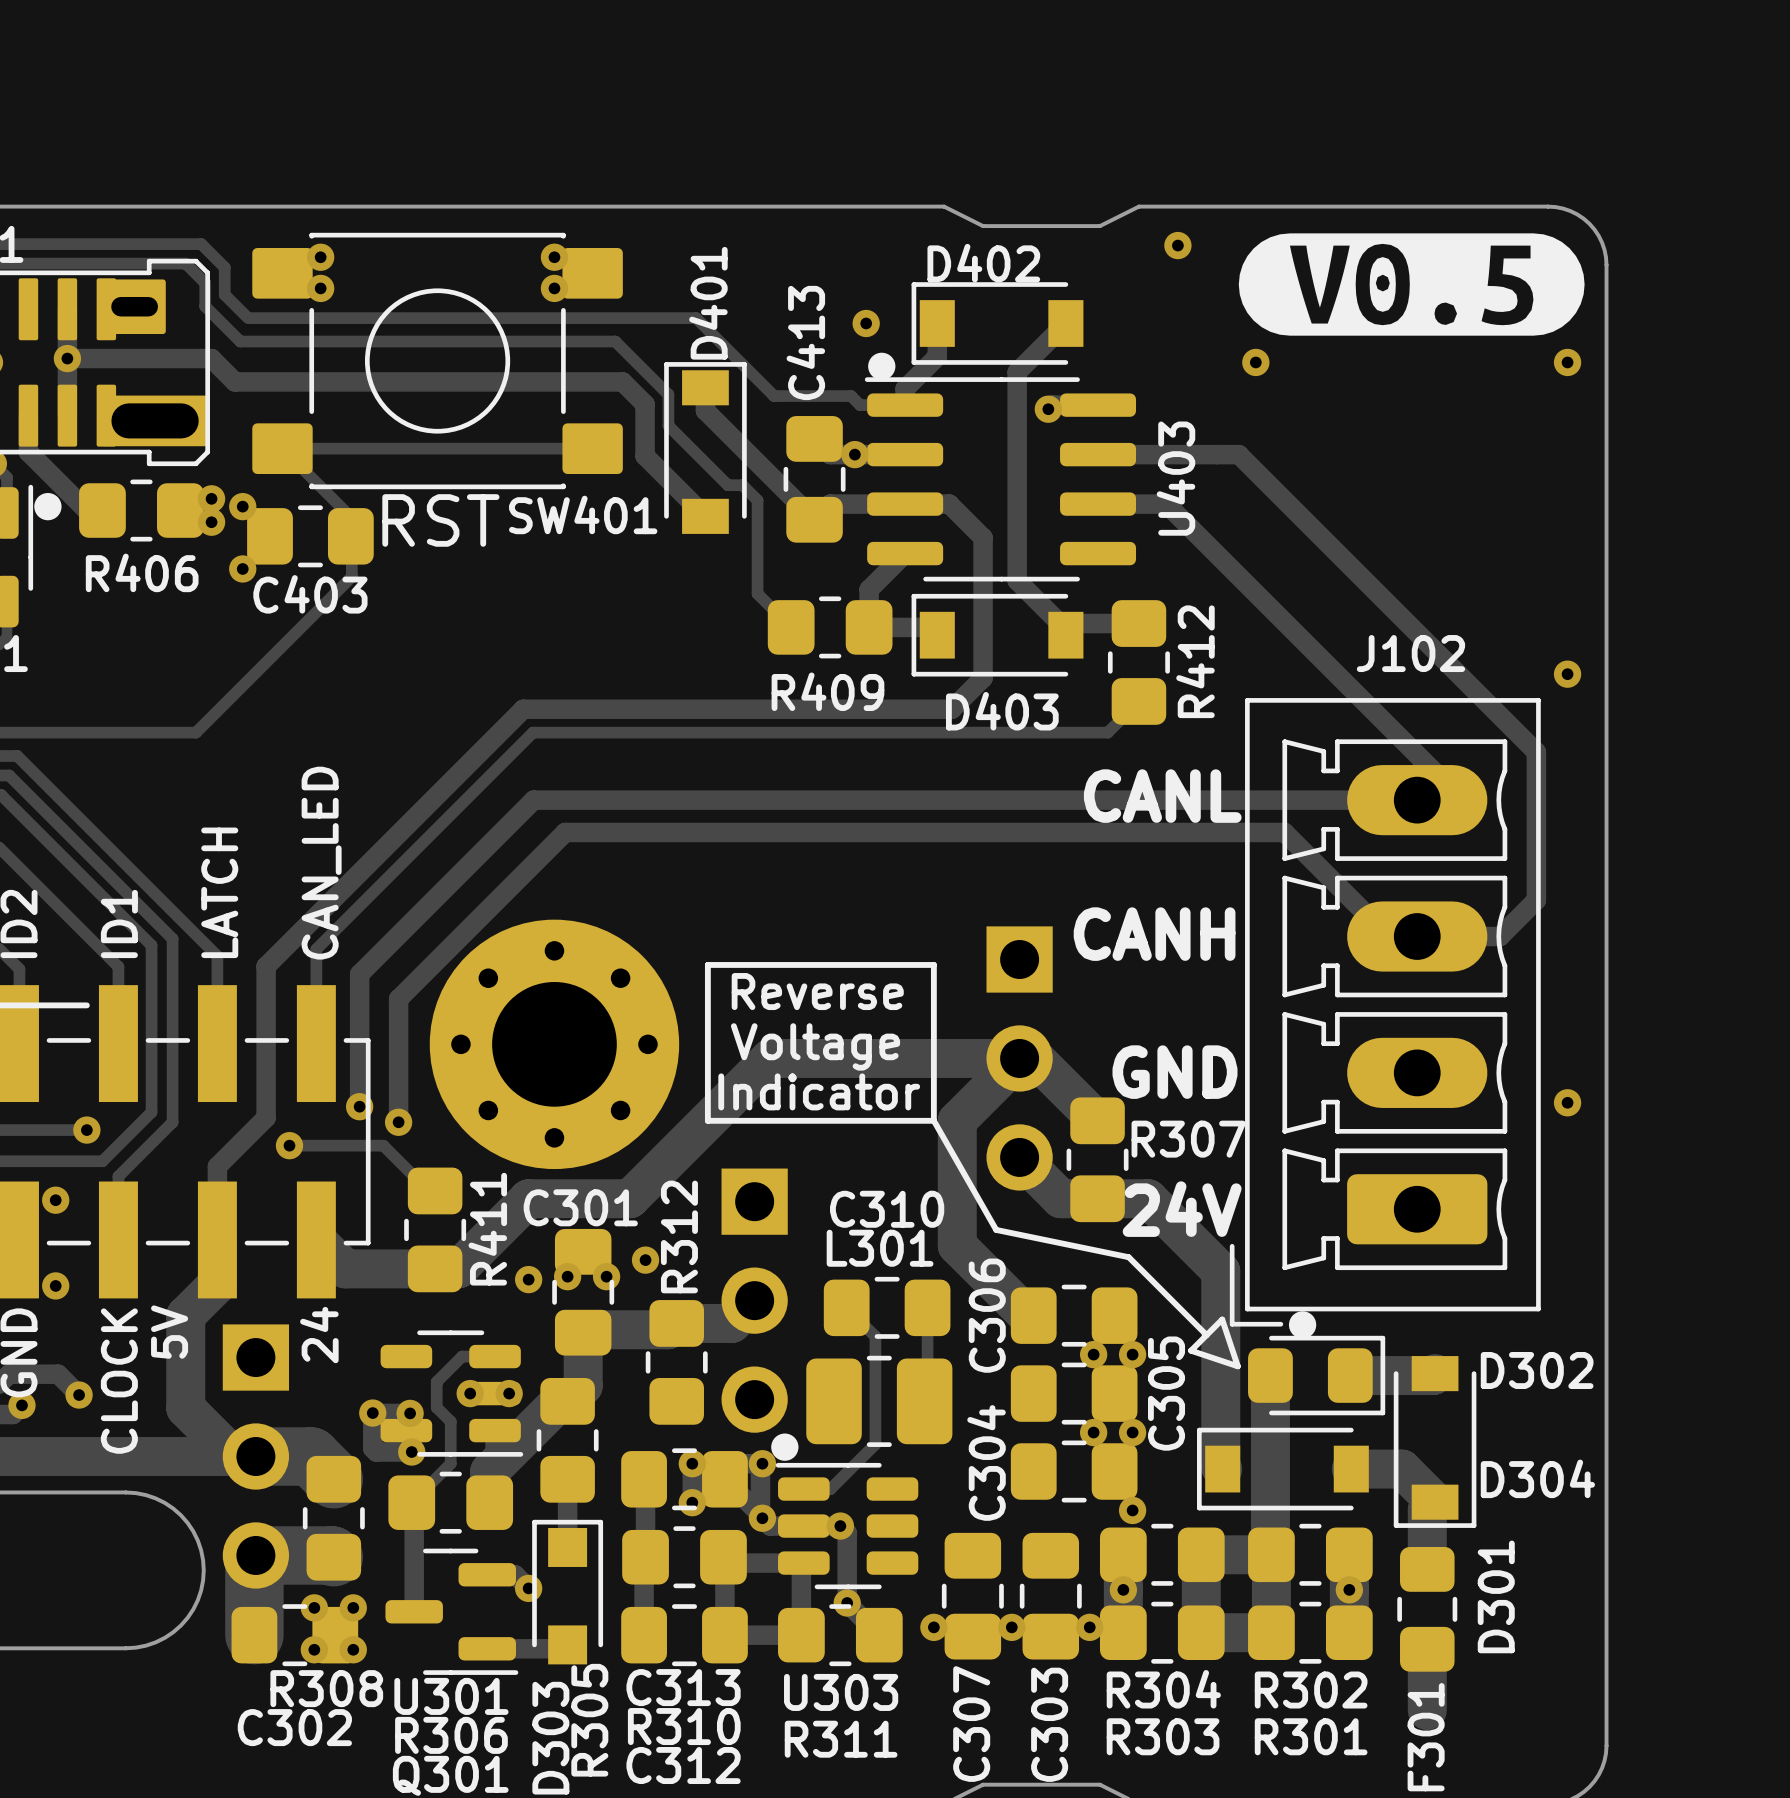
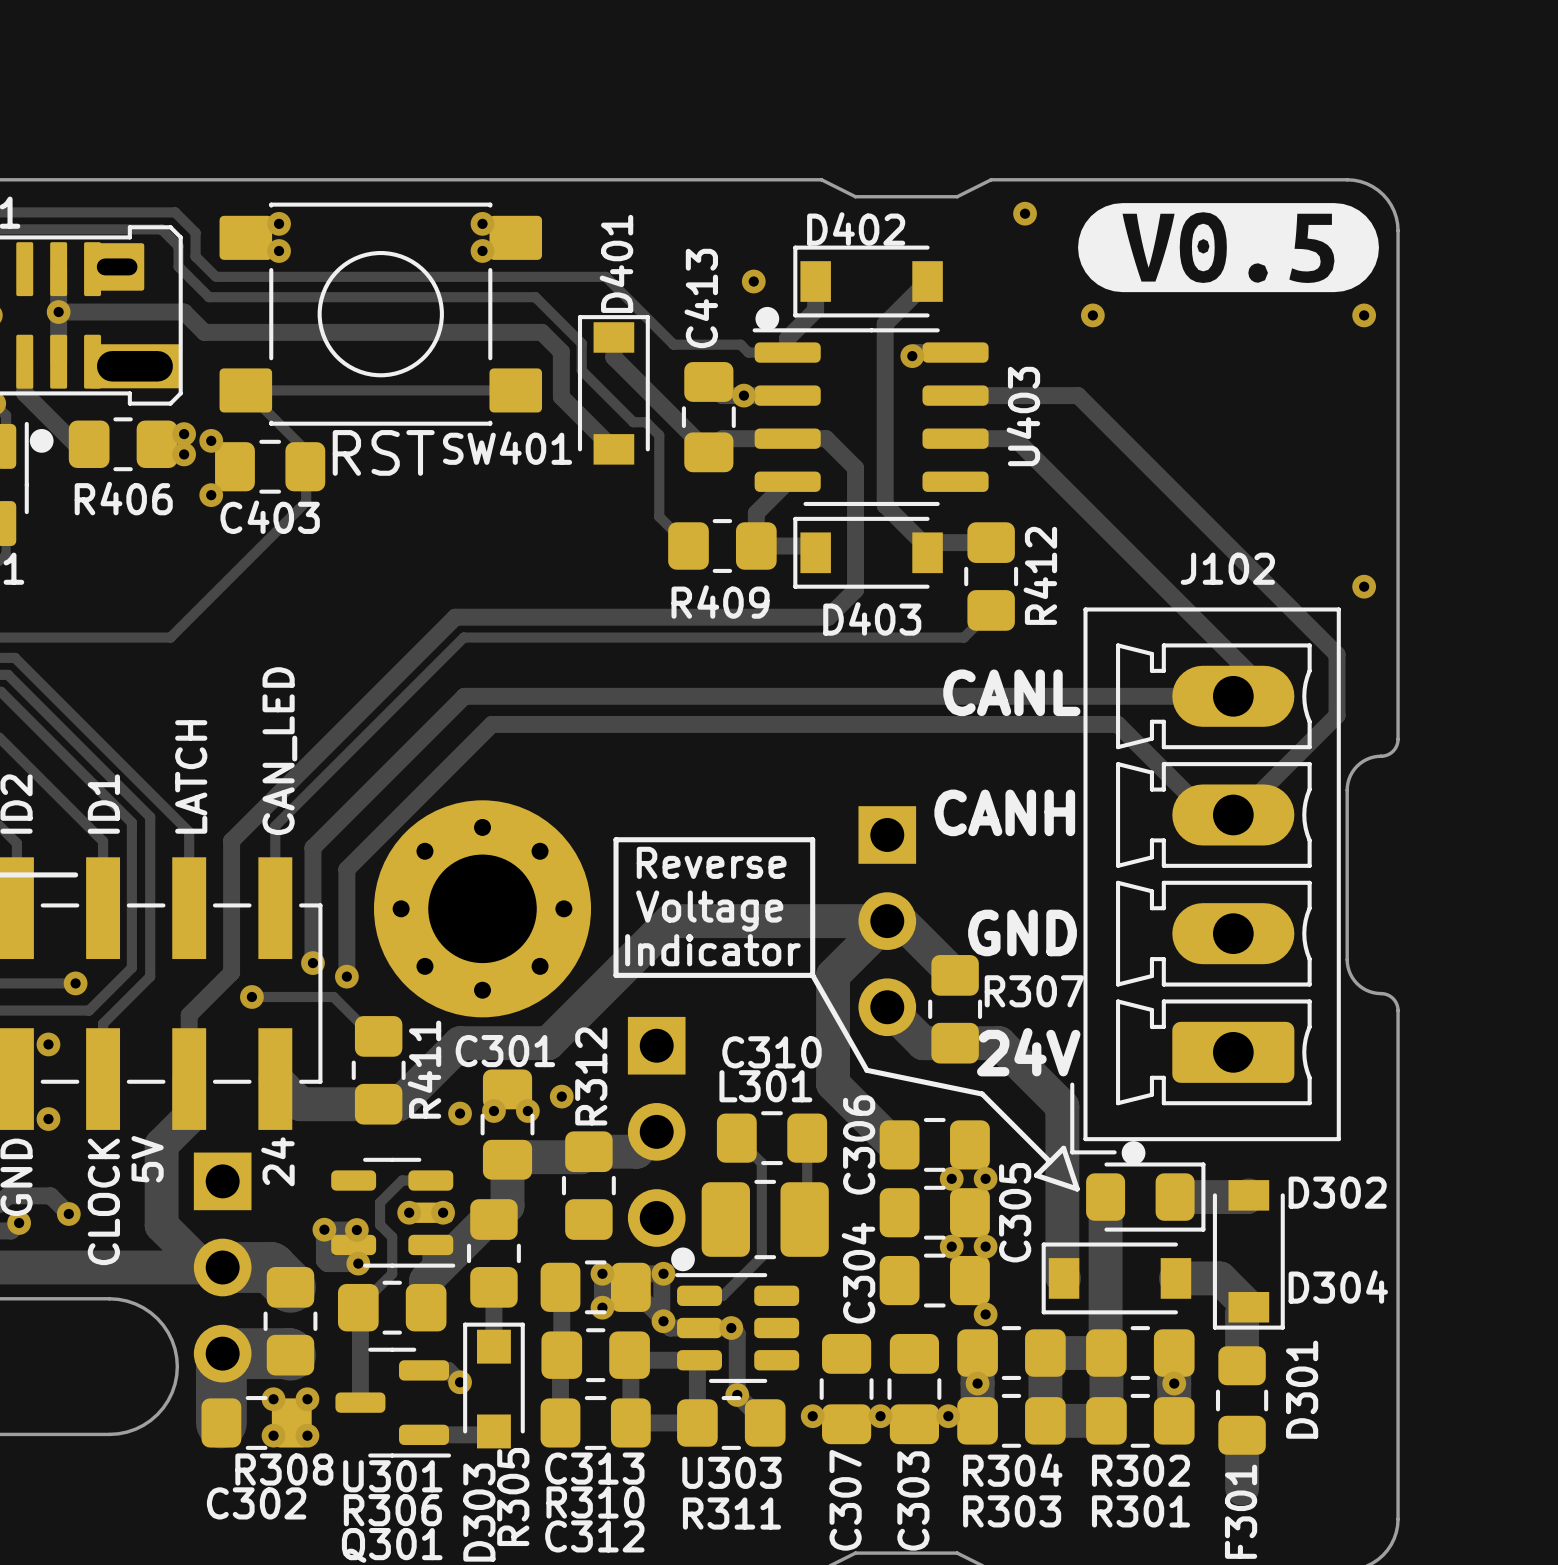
track: (1536, 822) (1536, 900) (1500, 936) (1422, 936) -> (1337, 715) (1237, 814)
board edge: (1606, 849) (1606, 1161) -> (1398, 739) (1395, 747) (1389, 753) (1369, 758) (1357, 766) (1350, 775) (1347, 790) (1348, 967) (1352, 977) (1359, 986) (1369, 991) (1389, 995) (1395, 1002) (1398, 1010)
via: (1567, 1102) -> none

